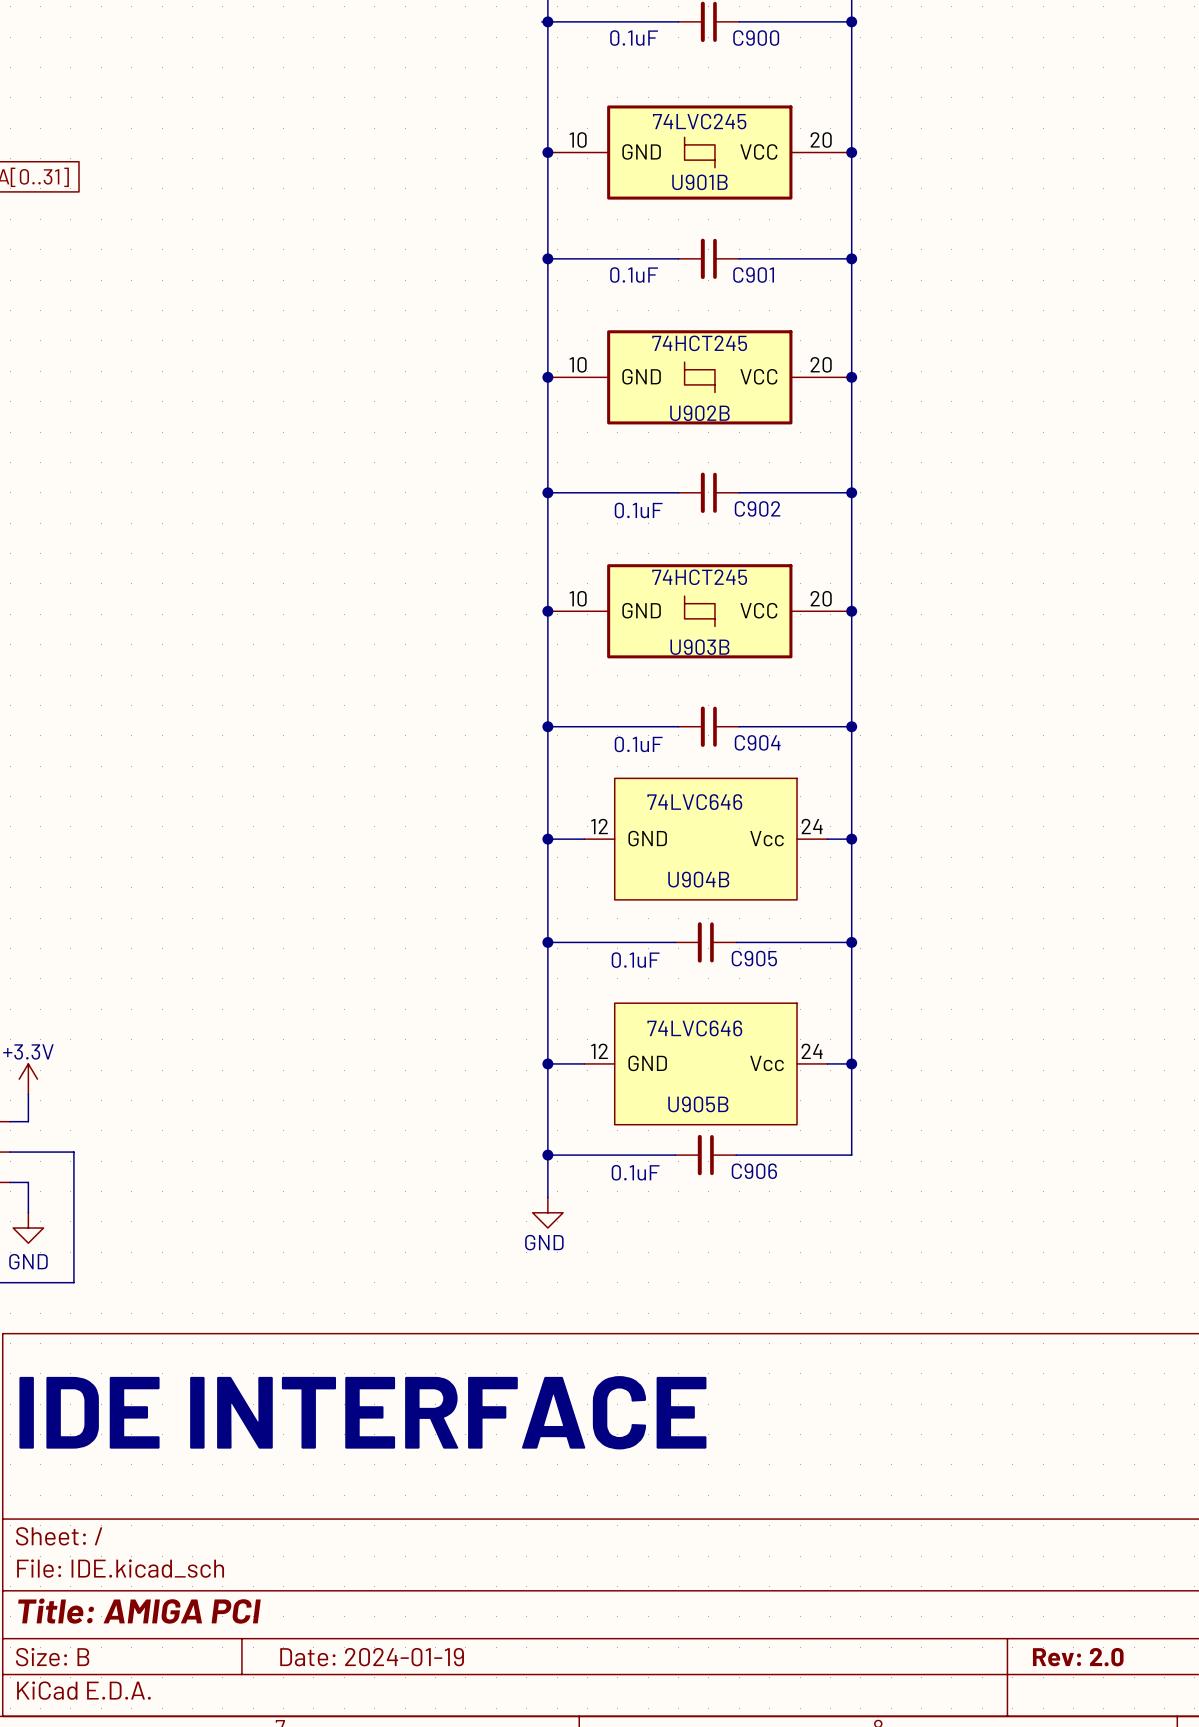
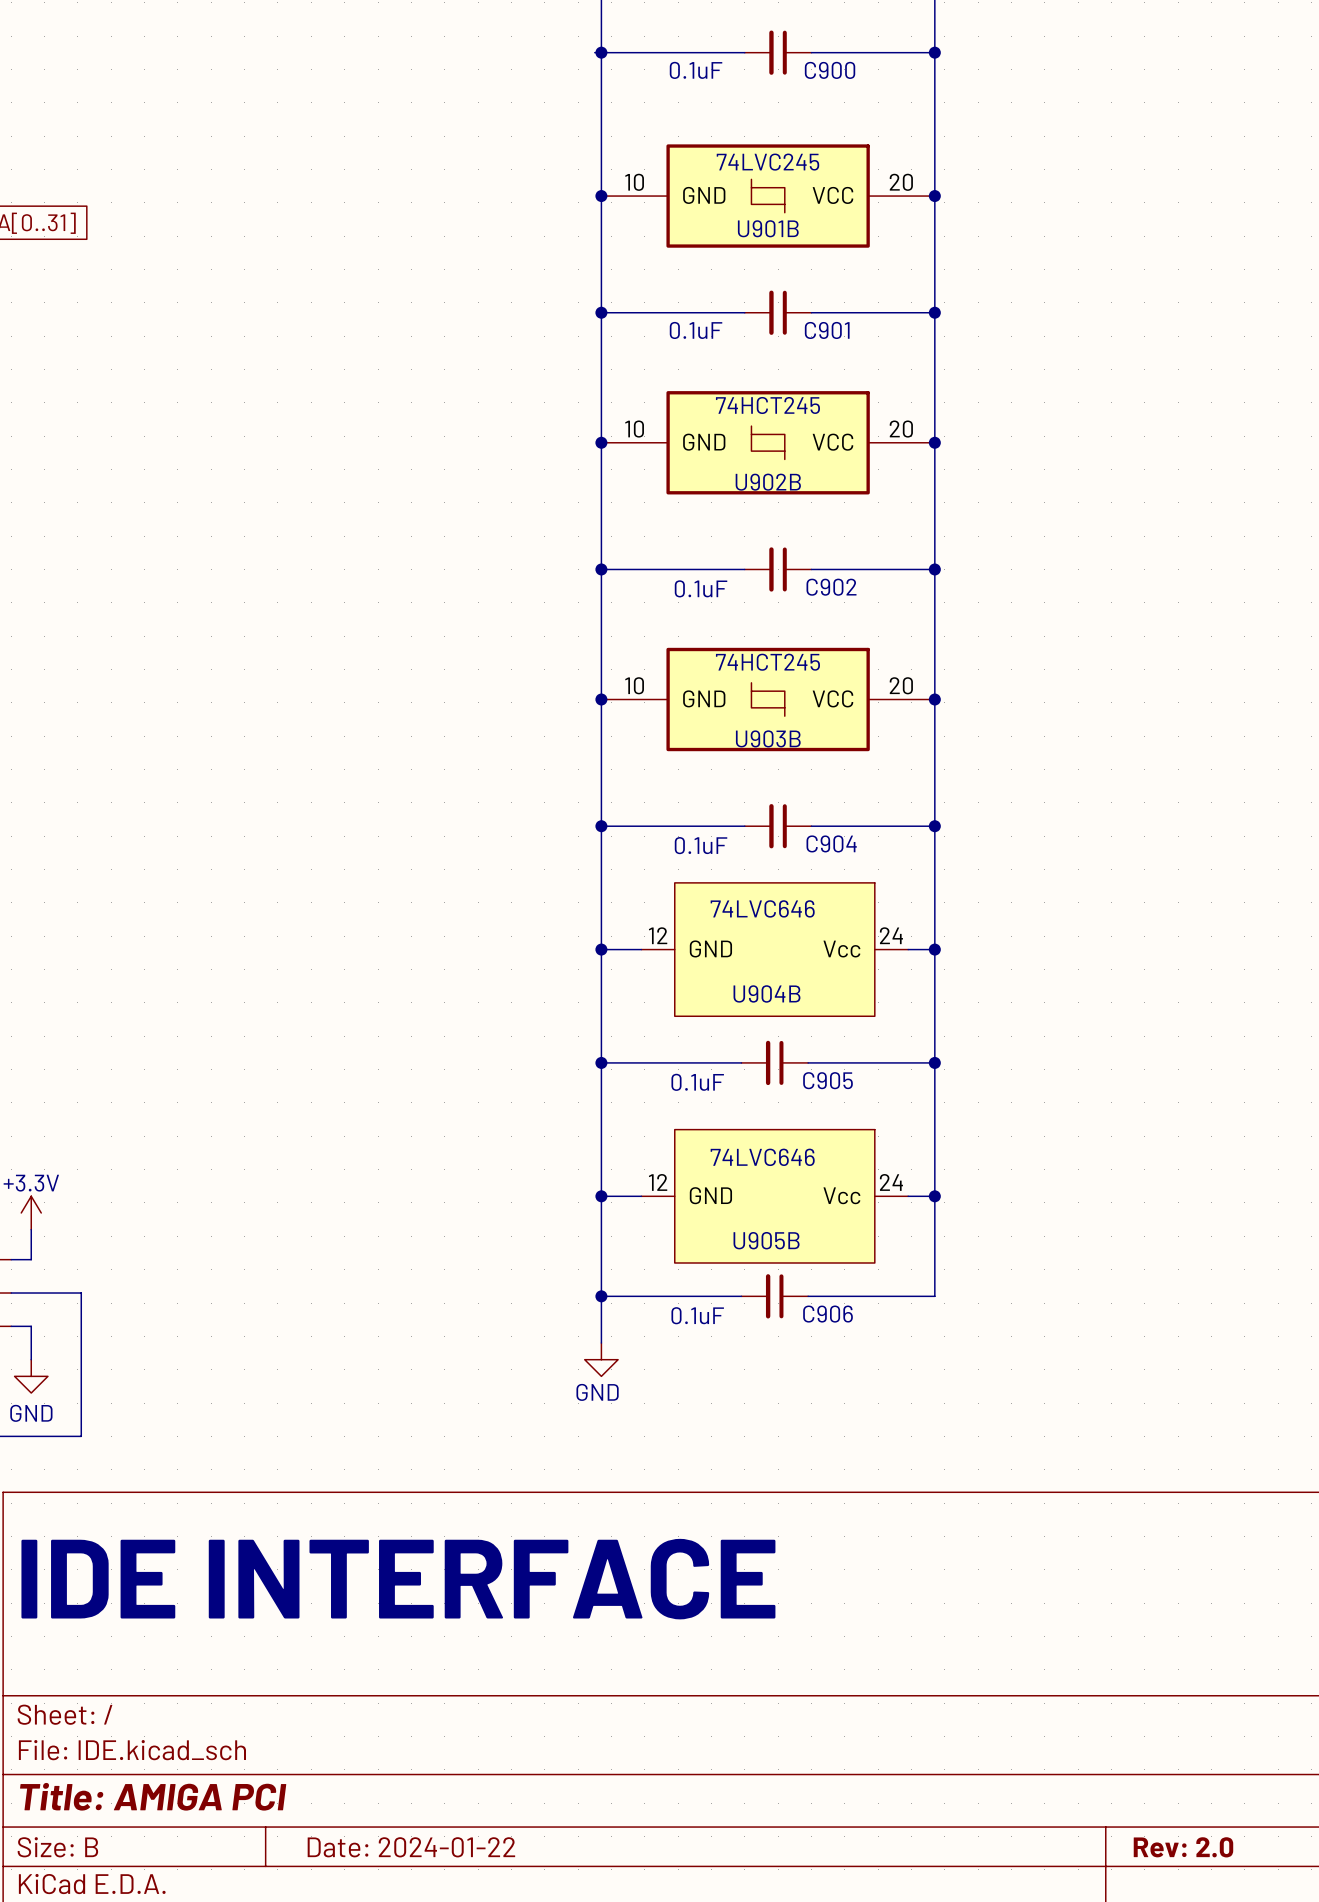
title block: Date: 2024-01-19 (372, 1657) -> Date: 2024-01-22 (411, 1847)

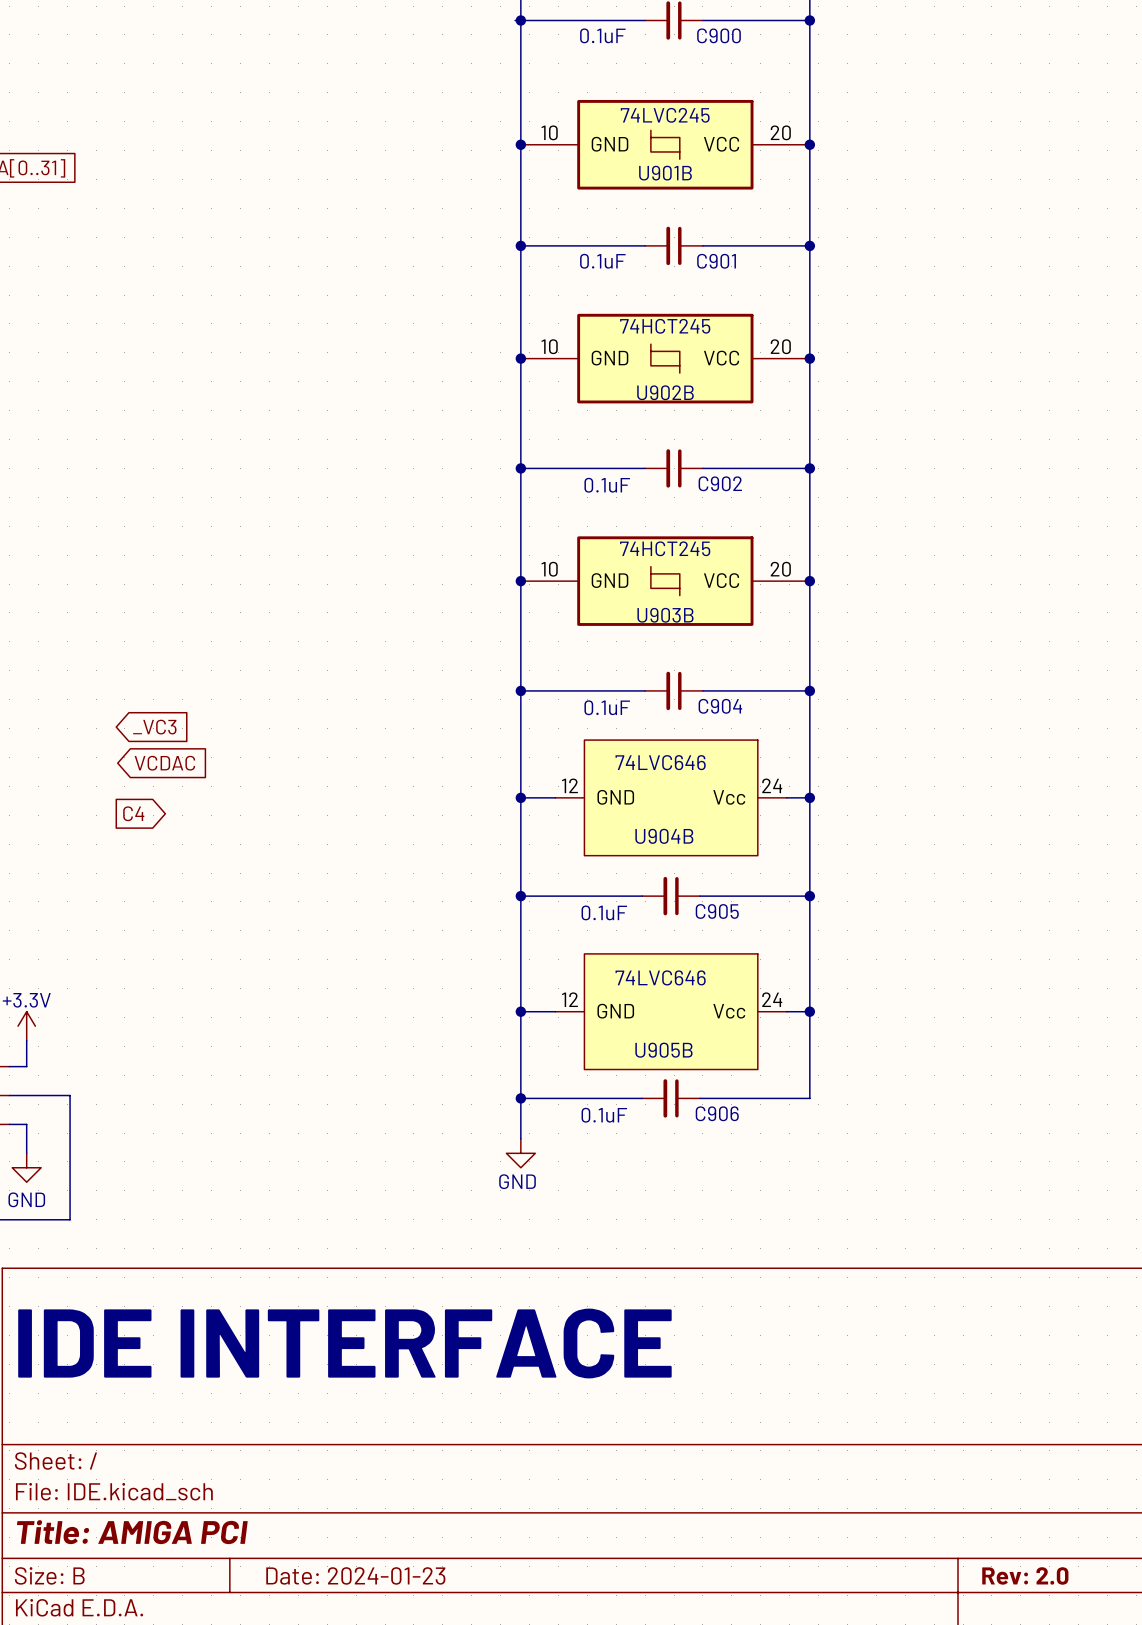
global label: none -> _VC3 (154, 727)
global label: none -> VCDAC (164, 763)
global label: none -> C4 (133, 813)
title block: Date: 2024-01-22 (411, 1847) -> Date: 2024-01-23 (355, 1575)

